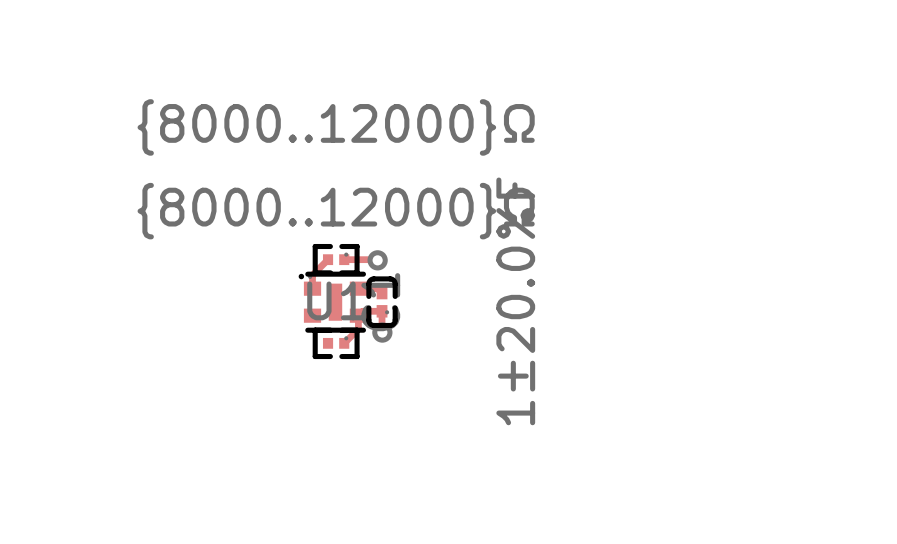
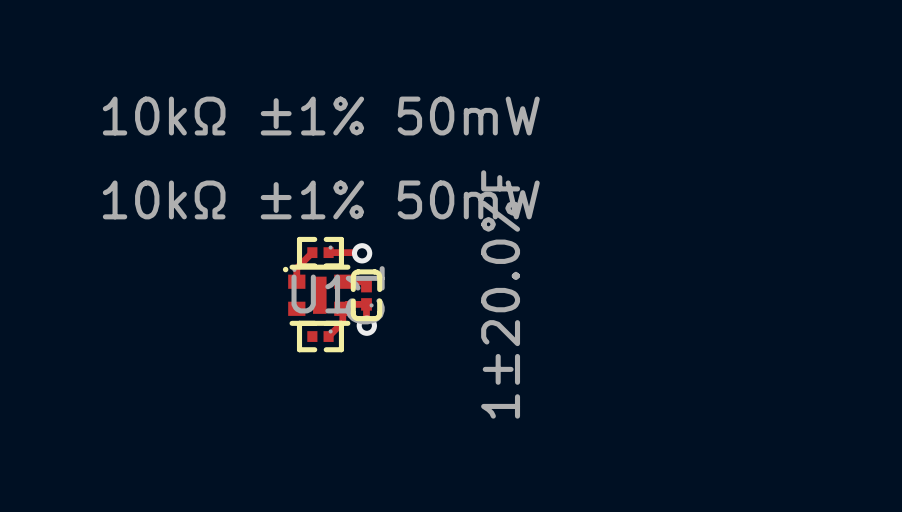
part value: {8000..12000}Ω (336, 127) -> 10kΩ ±1% 50mW (321, 116)
part value: {8000..12000}Ω (336, 211) -> 10kΩ ±1% 50mW (321, 199)

